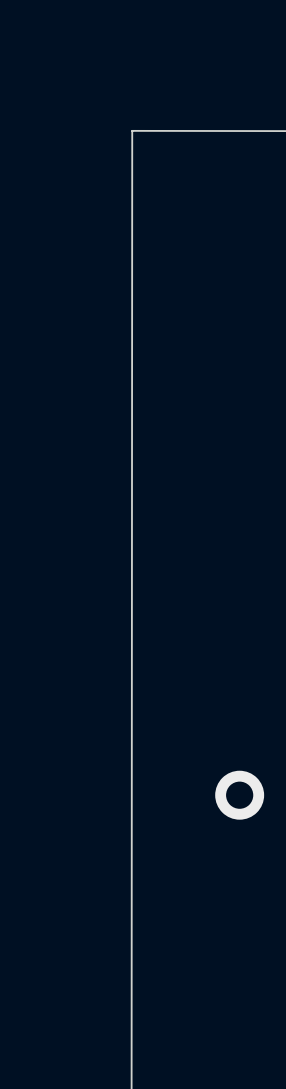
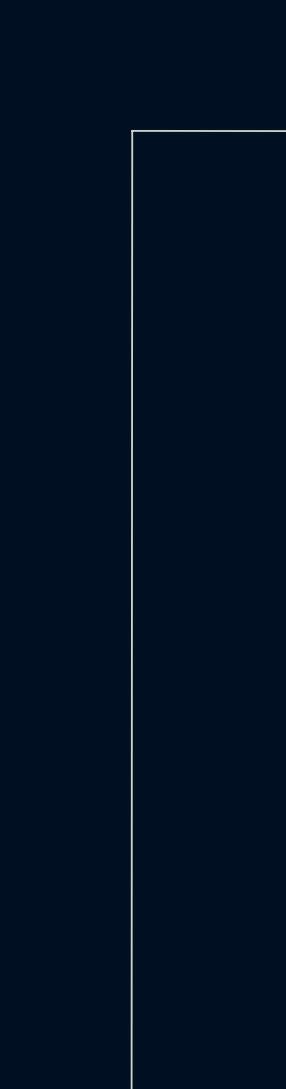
via: (239, 795) -> none

